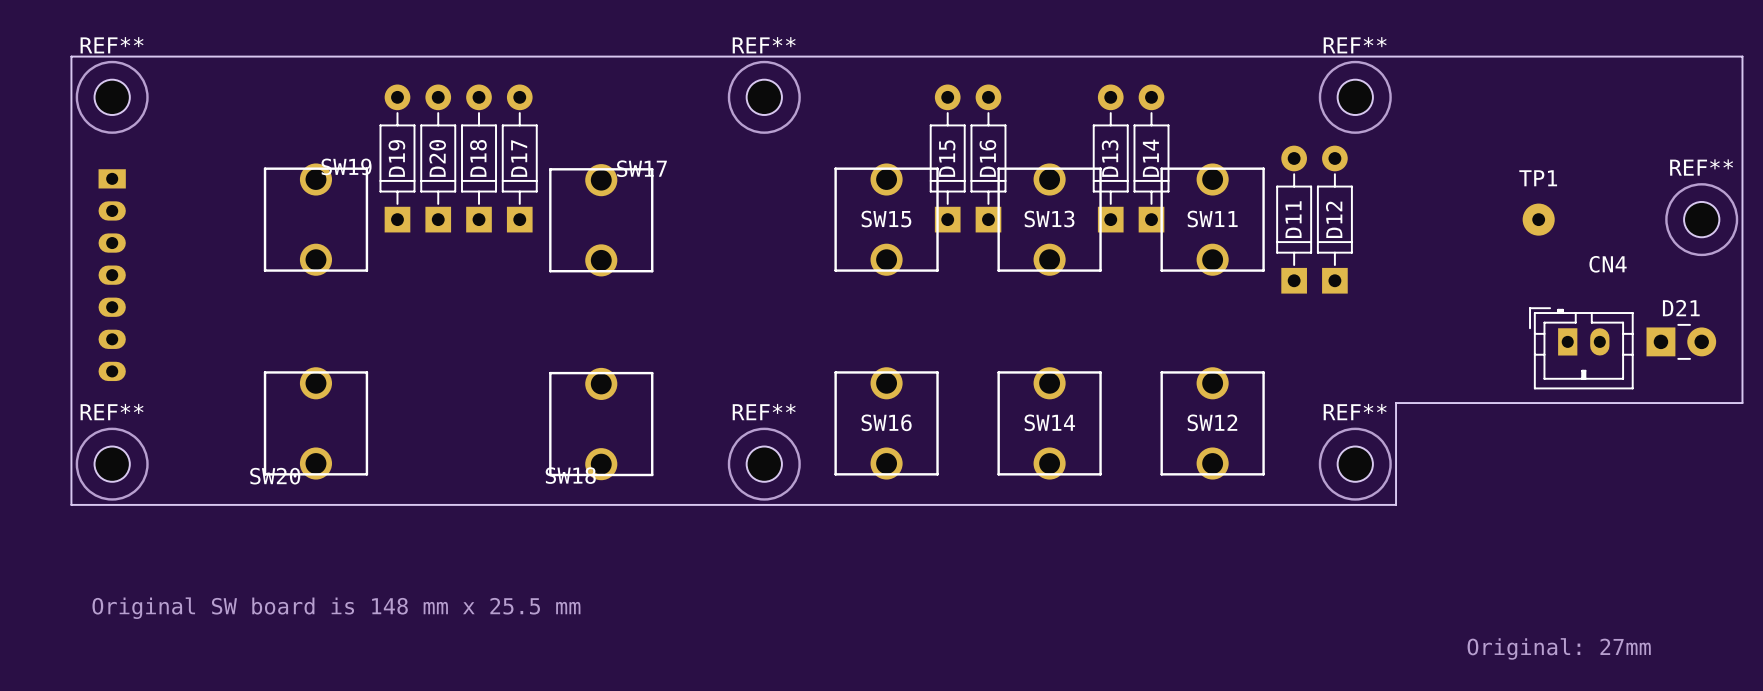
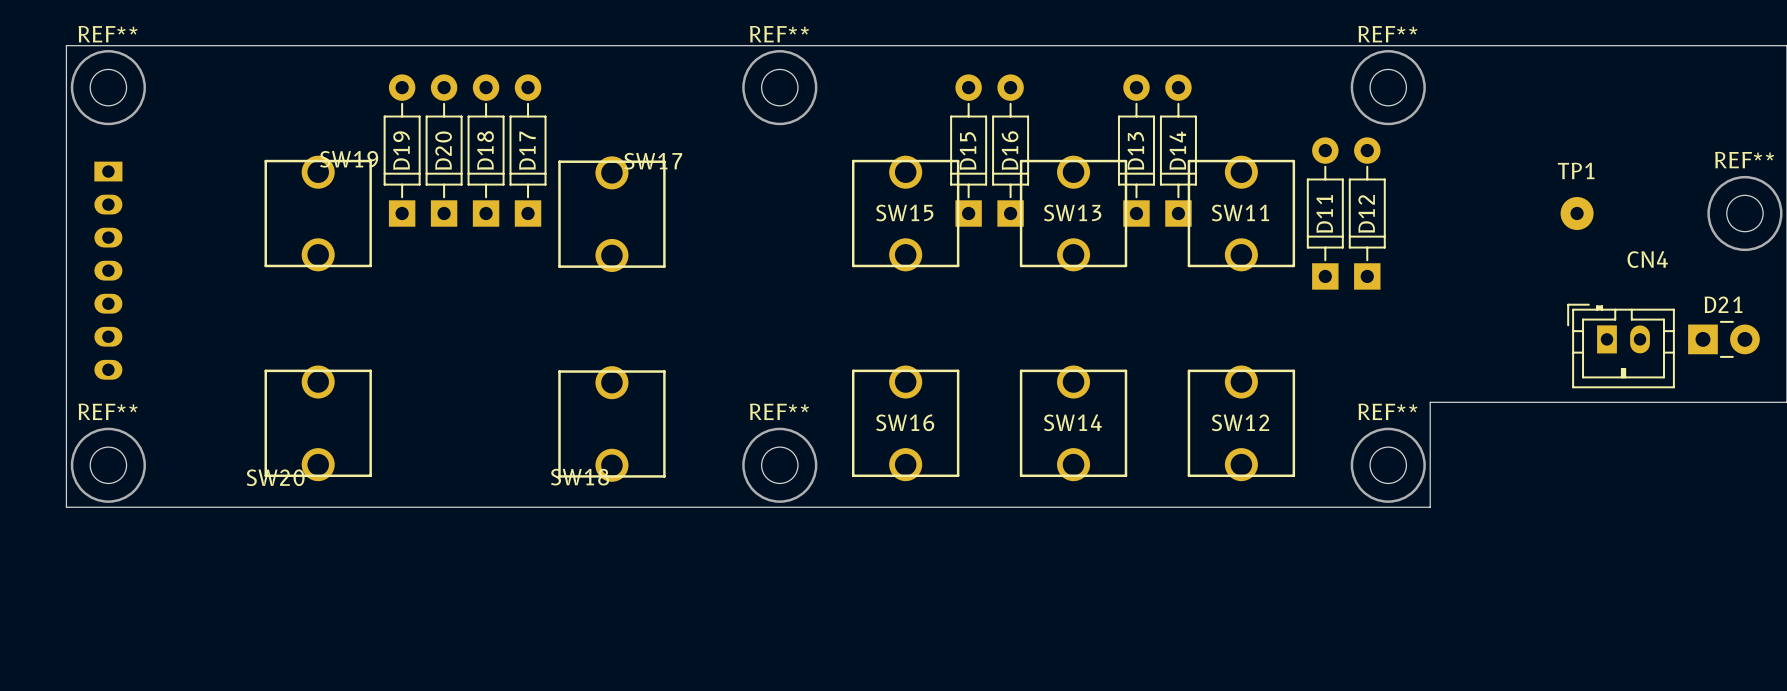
text: Original SW board is 148 mm x 25.5 mm (336, 608) -> none
text: Original: 27mm (1559, 648) -> none

